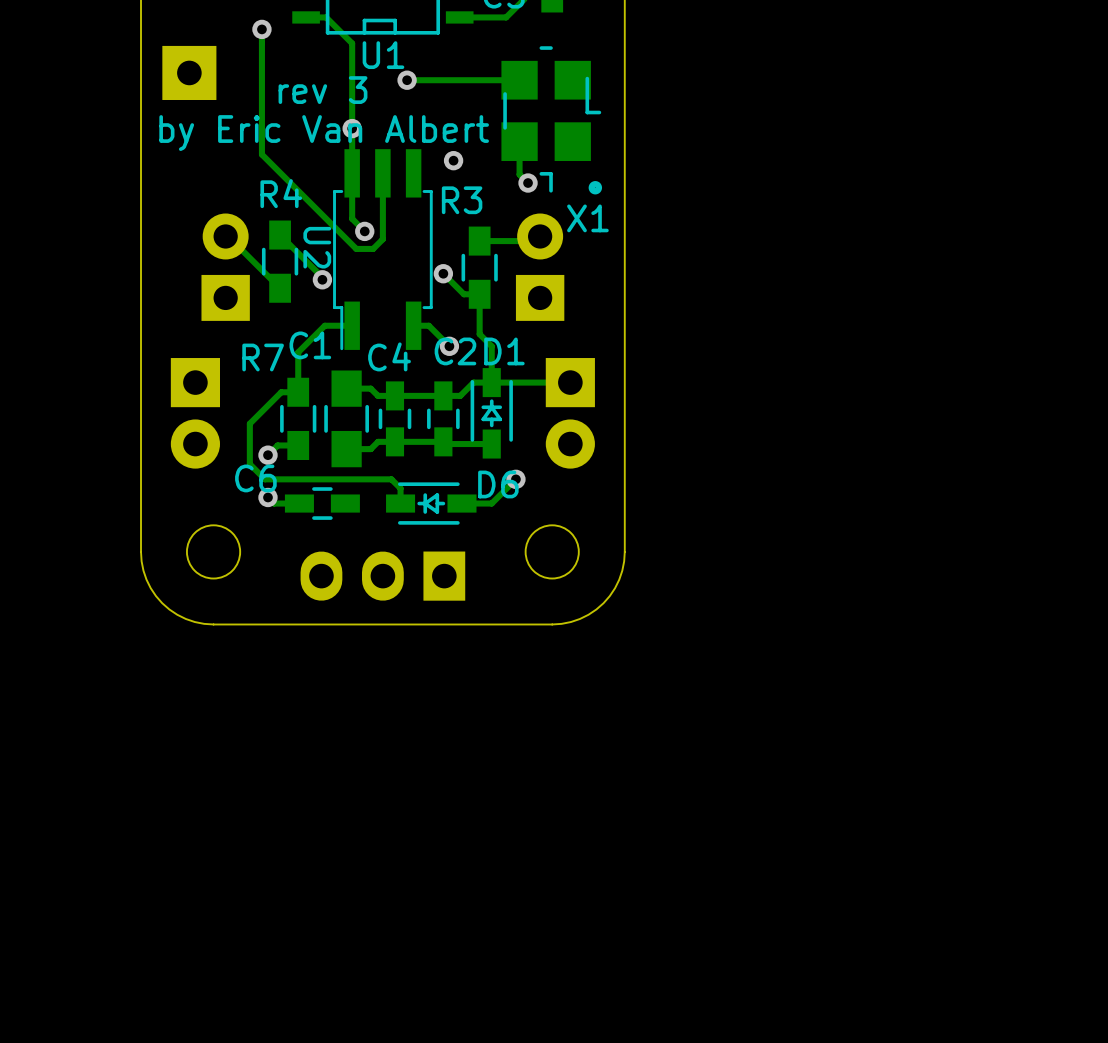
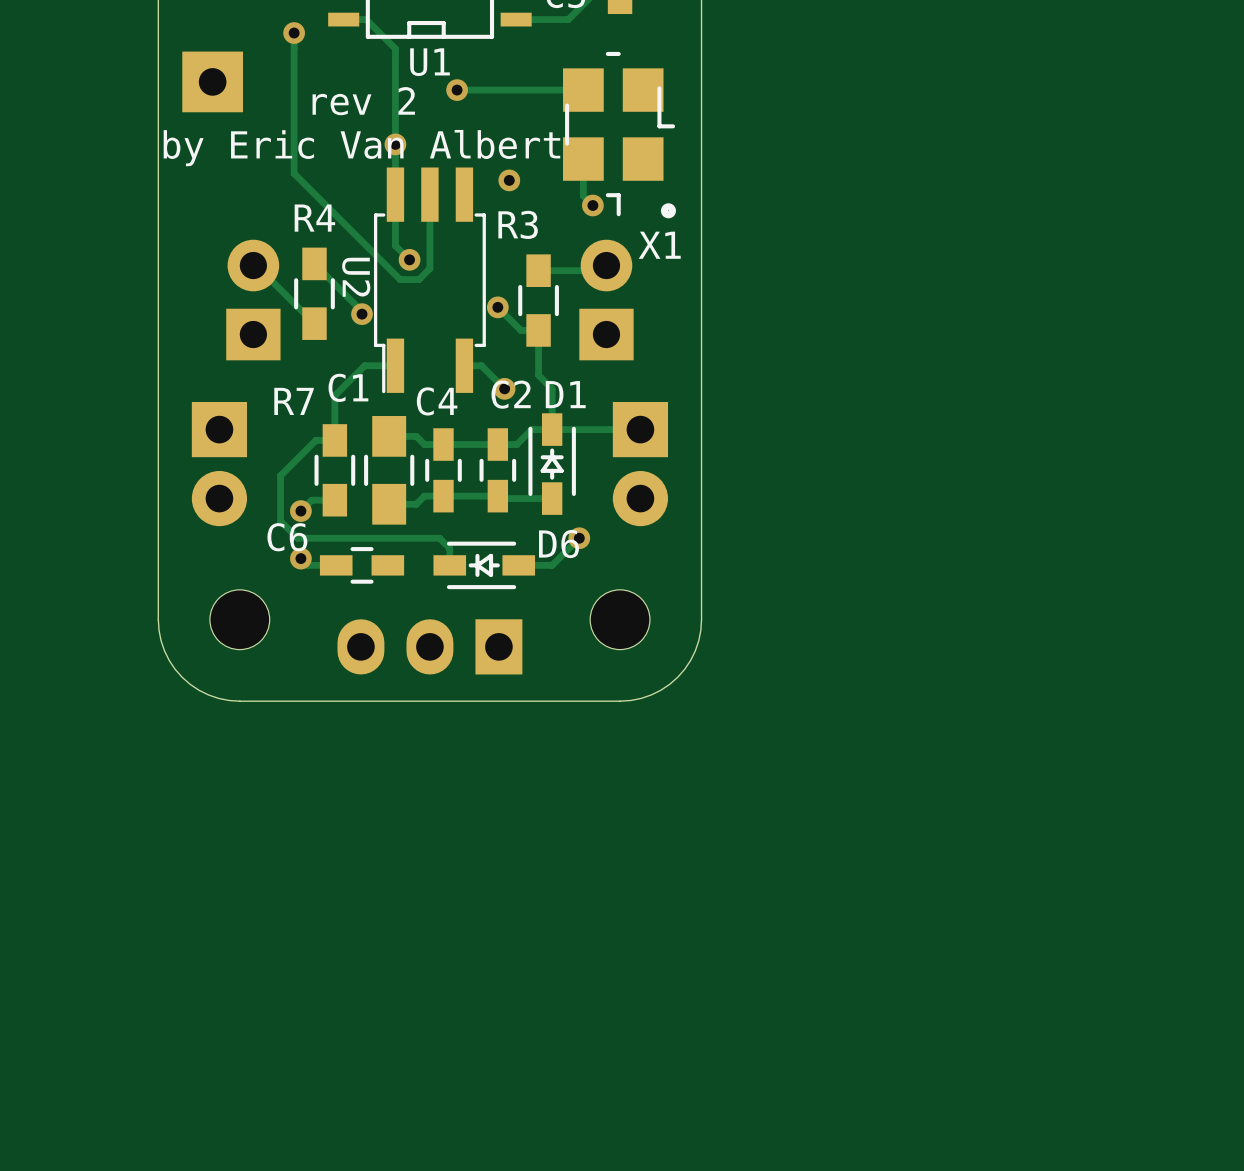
text: rev 3 (323, 90) -> rev 2 (363, 101)

